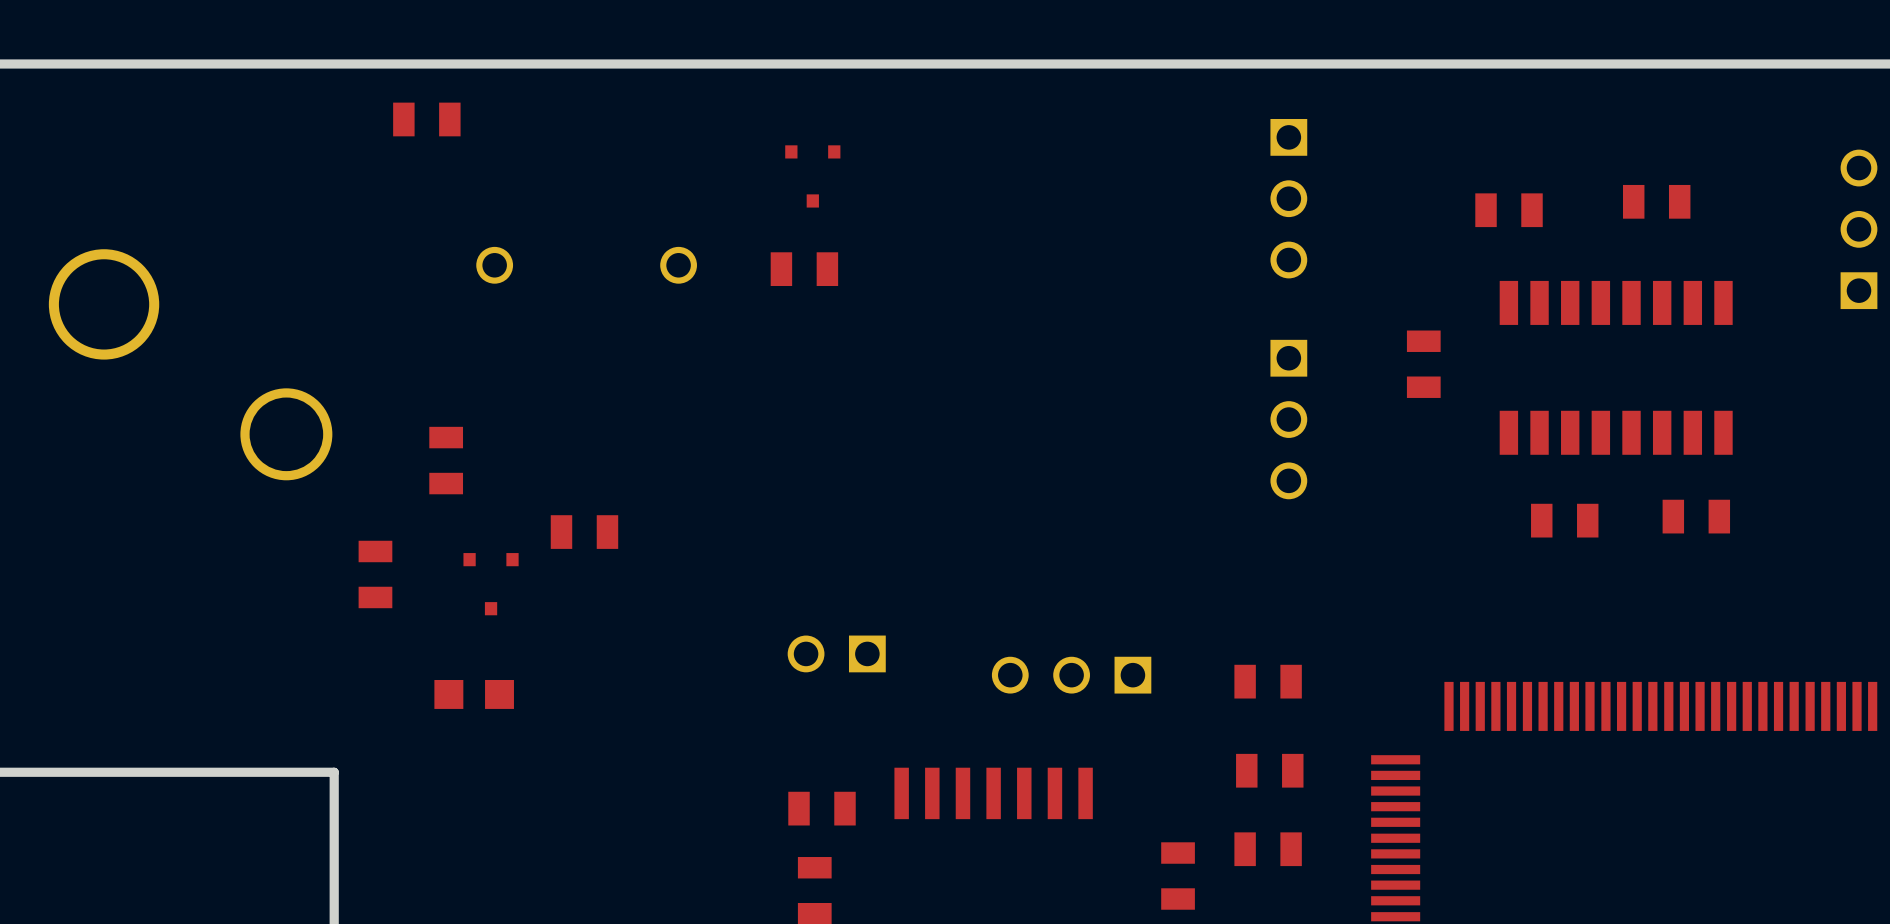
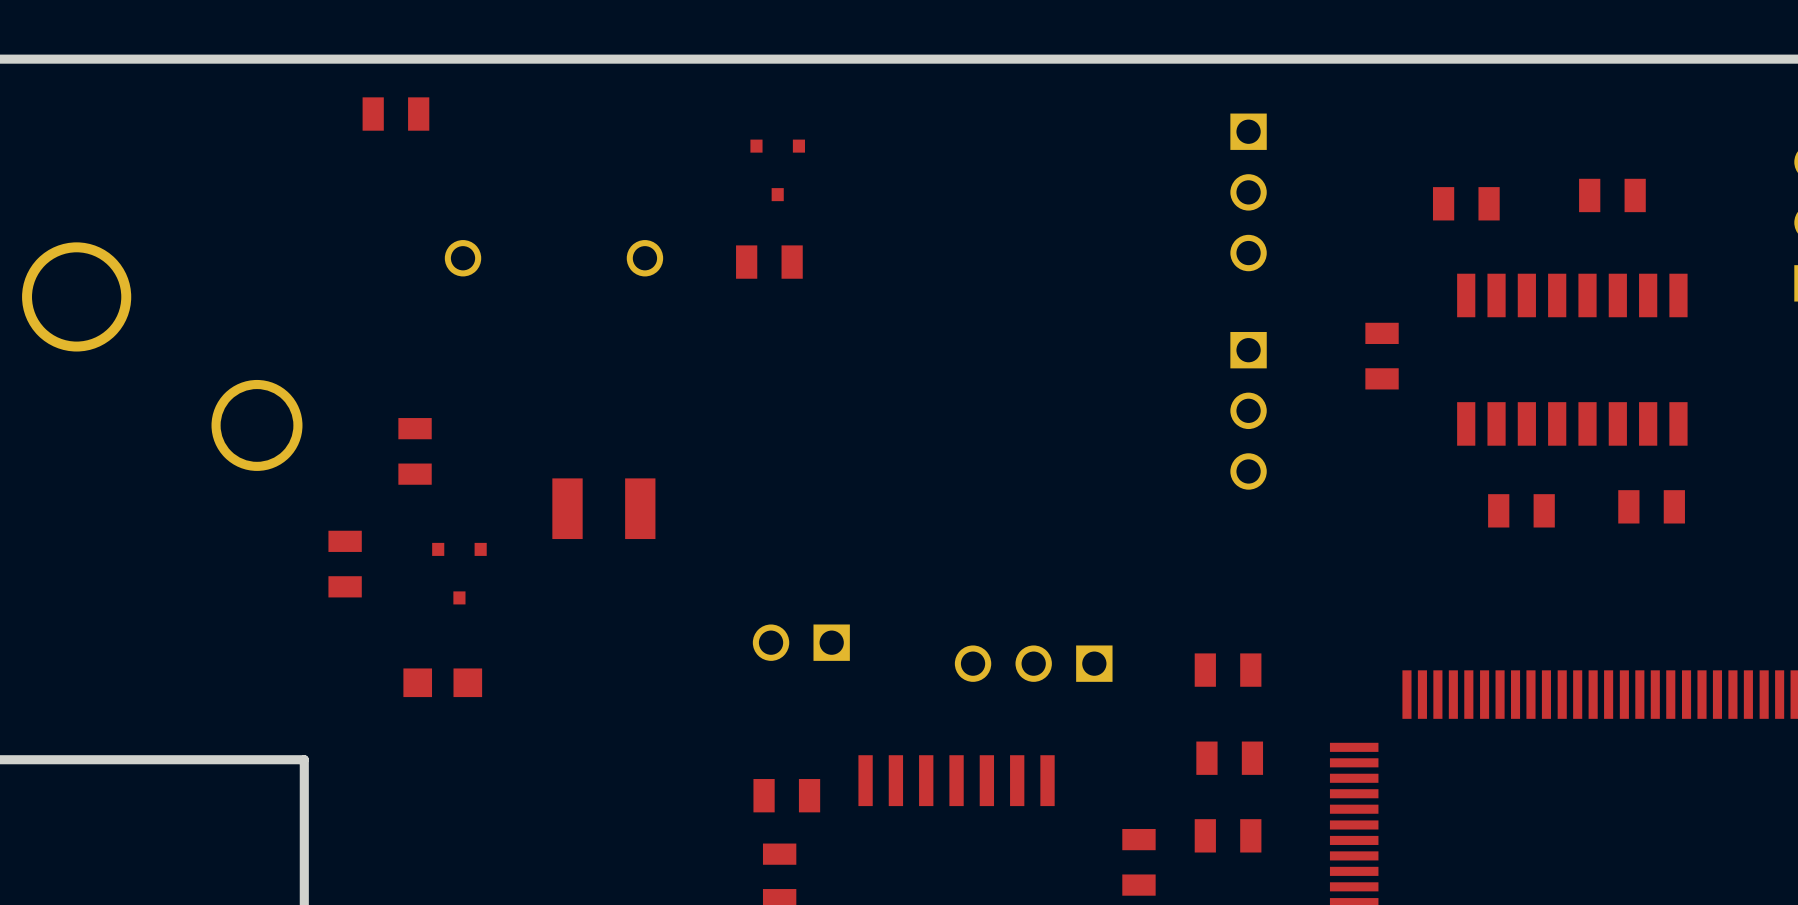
part: none -> (603, 508)
part: (584, 532) -> none

